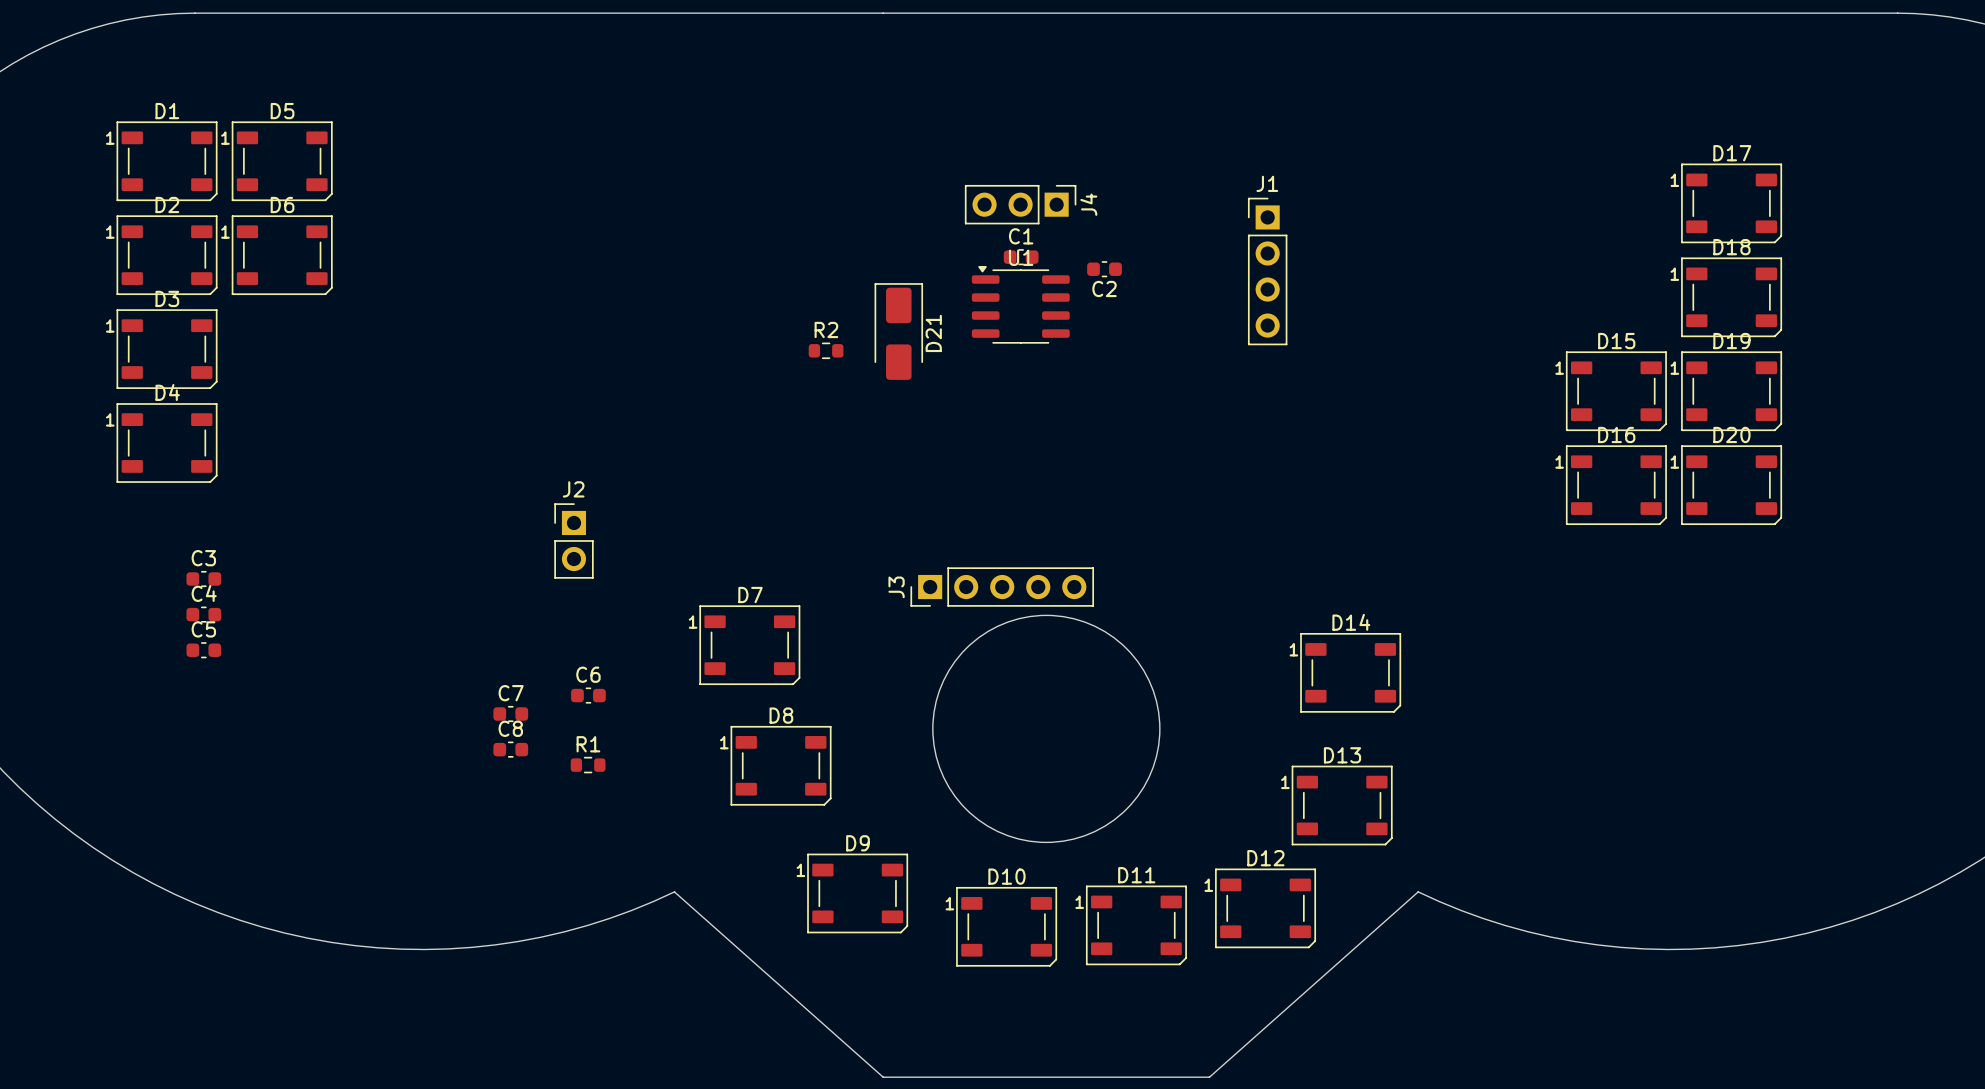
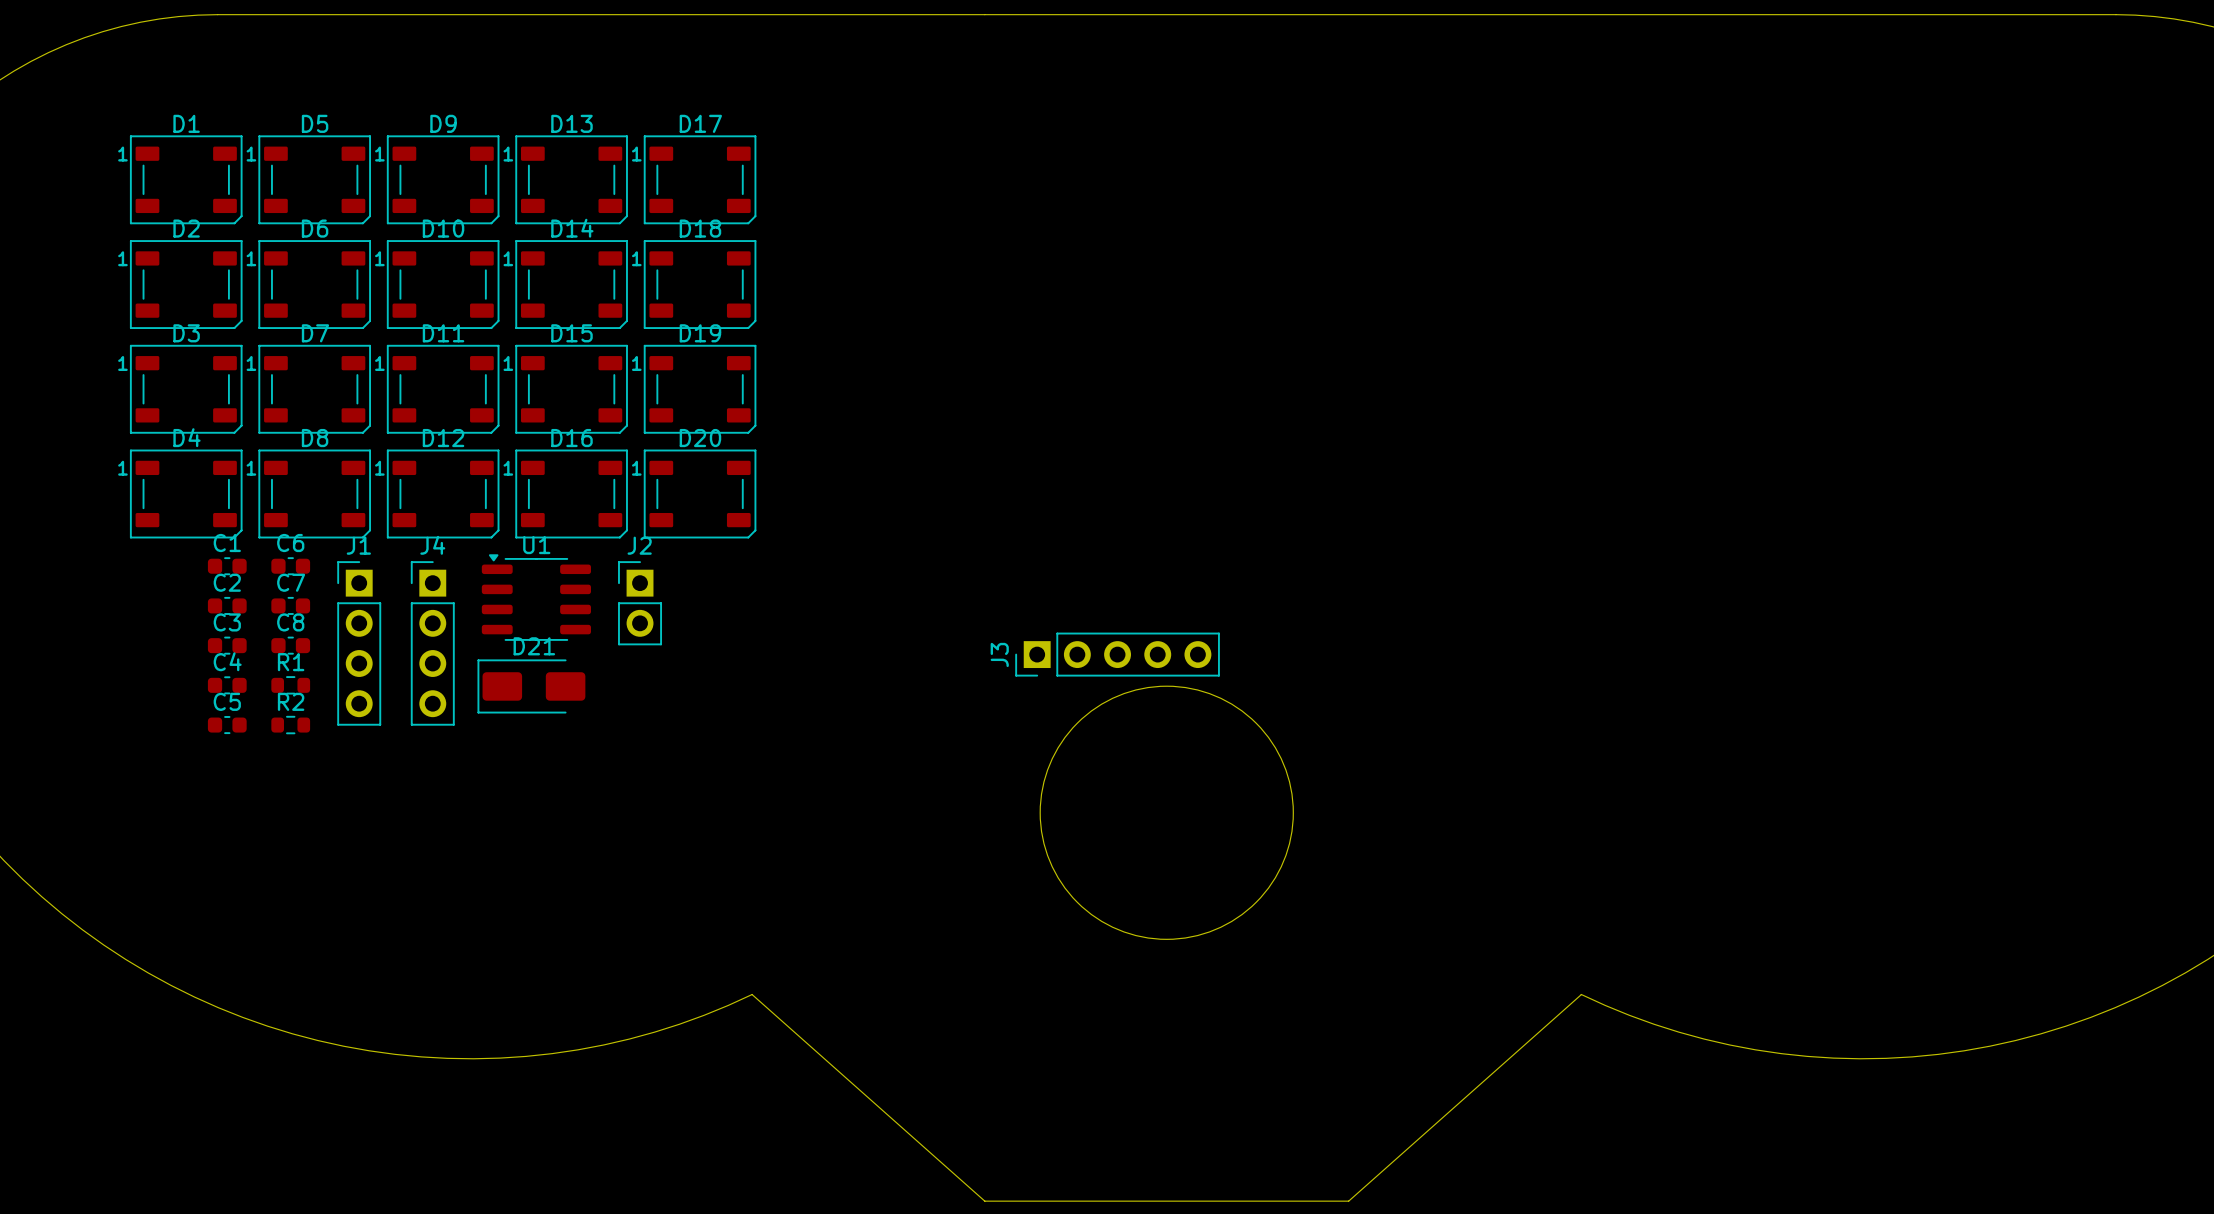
J4 footprint: [964, 184, 1077, 225] -> [410, 561, 455, 726]
D17 position: (1731, 203) -> (700, 179)
J4 name position: J4 (1088, 204) -> J4 (432, 545)
C1 position: (1021, 257) -> (227, 566)
C2 position: (1104, 269) -> (227, 605)
J1 position: (1267, 271) -> (359, 643)
C2 name position: C2 (1104, 288) -> C2 (227, 582)
D18 position: (1731, 297) -> (700, 284)
U1 position: (1020, 304) -> (536, 597)
D21 rotation: 0° (898, 331) -> 90° counterclockwise (531, 686)
D21 position: (898, 331) -> (531, 686)
R2 position: (826, 350) -> (290, 725)
D15 position: (1616, 391) -> (571, 389)
D19 position: (1731, 391) -> (700, 389)
D16 position: (1616, 485) -> (571, 494)
D20 position: (1731, 485) -> (700, 494)
D7 position: (749, 645) -> (314, 389)
D14 position: (1350, 672) -> (571, 284)
C6 position: (588, 695) -> (290, 566)
C7 position: (510, 714) -> (290, 605)
C8 position: (510, 749) -> (290, 645)
R1 position: (588, 765) -> (290, 685)
D8 position: (781, 765) -> (314, 494)
D13 position: (1342, 805) -> (571, 179)
D9 position: (857, 893) -> (443, 179)
D12 position: (1265, 908) -> (443, 494)
D11 position: (1136, 925) -> (443, 389)
D10 position: (1006, 926) -> (443, 284)

